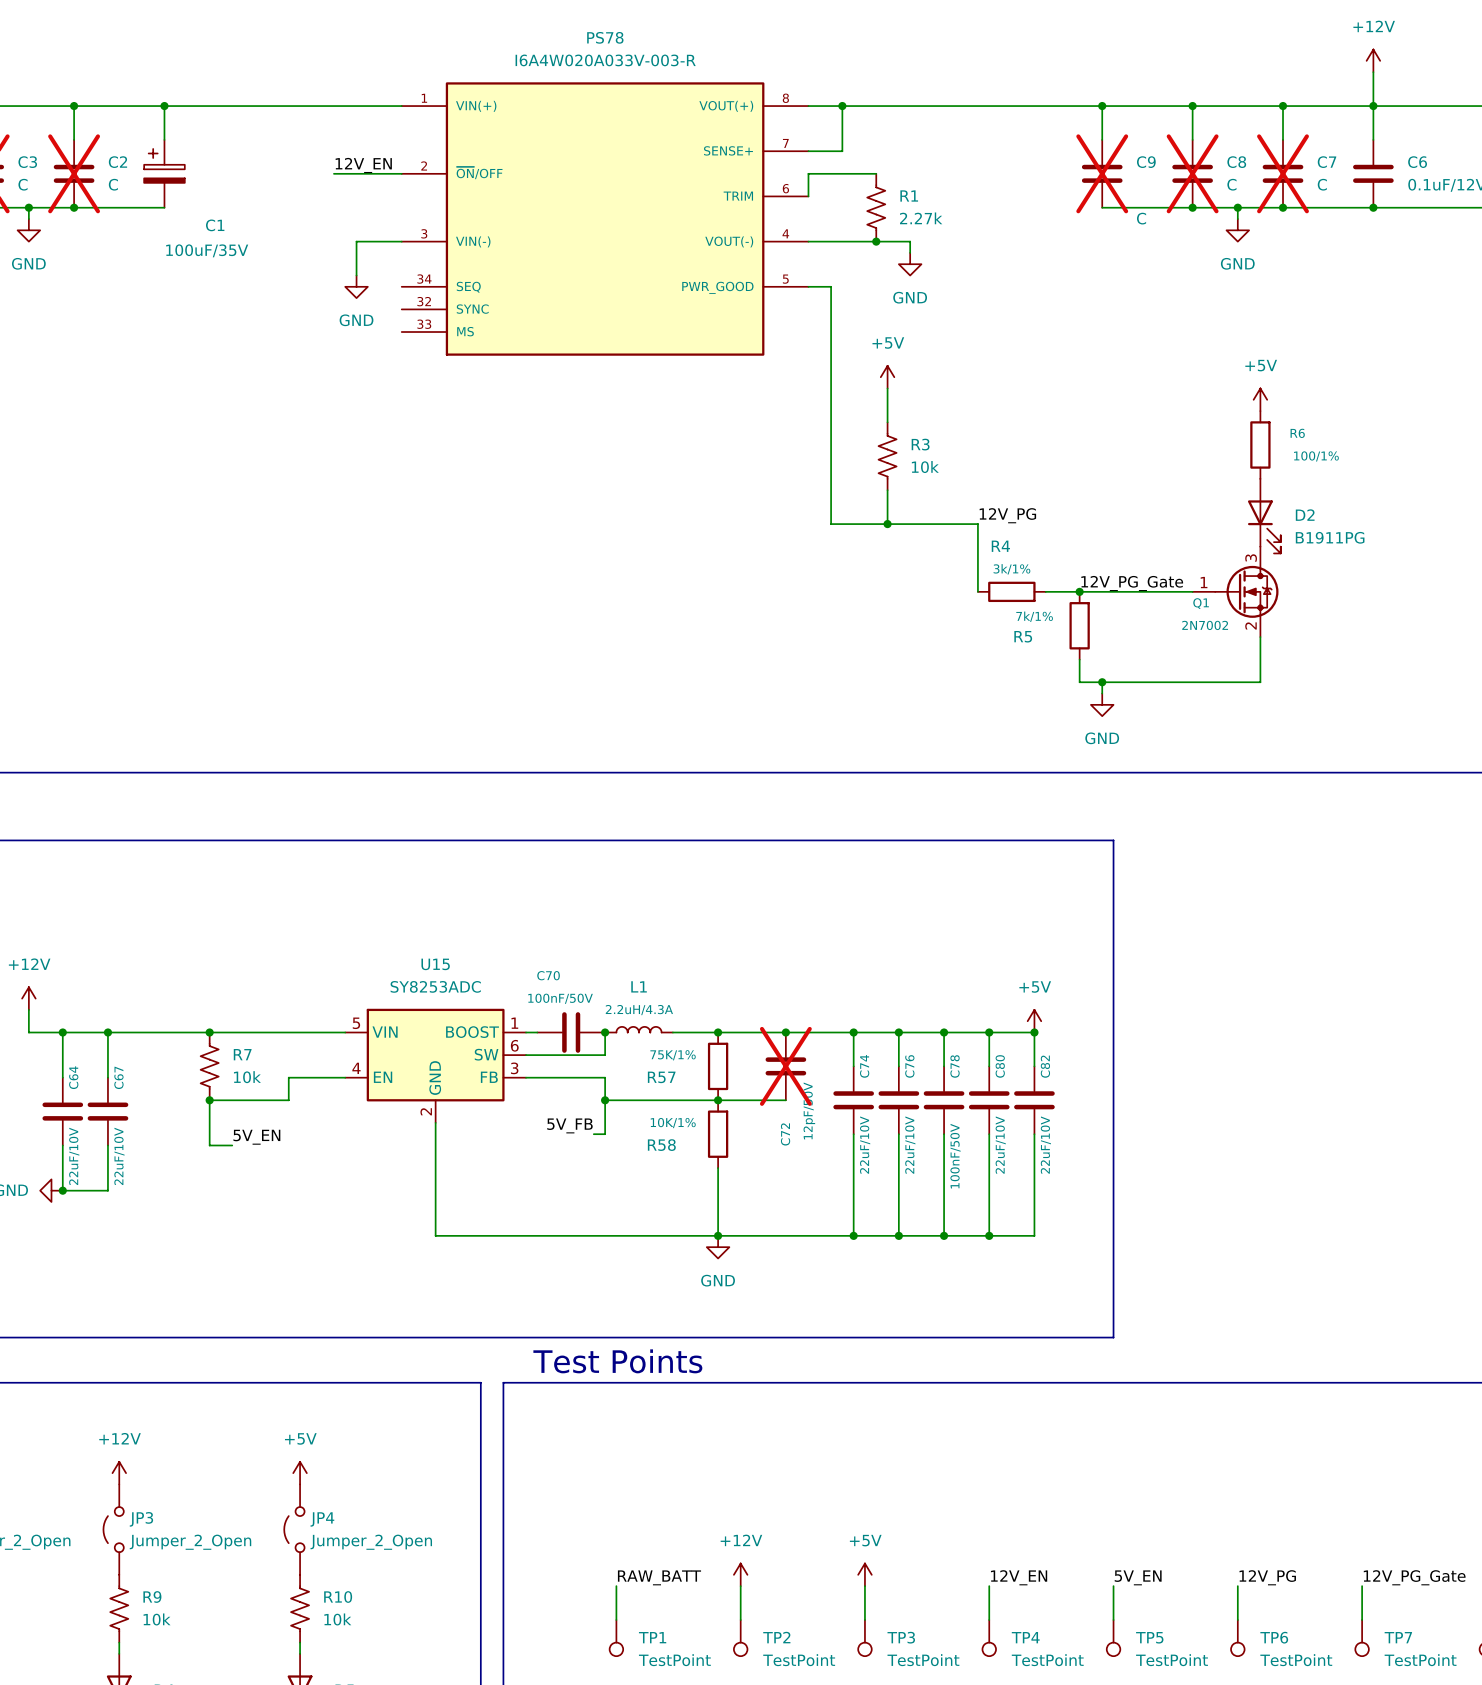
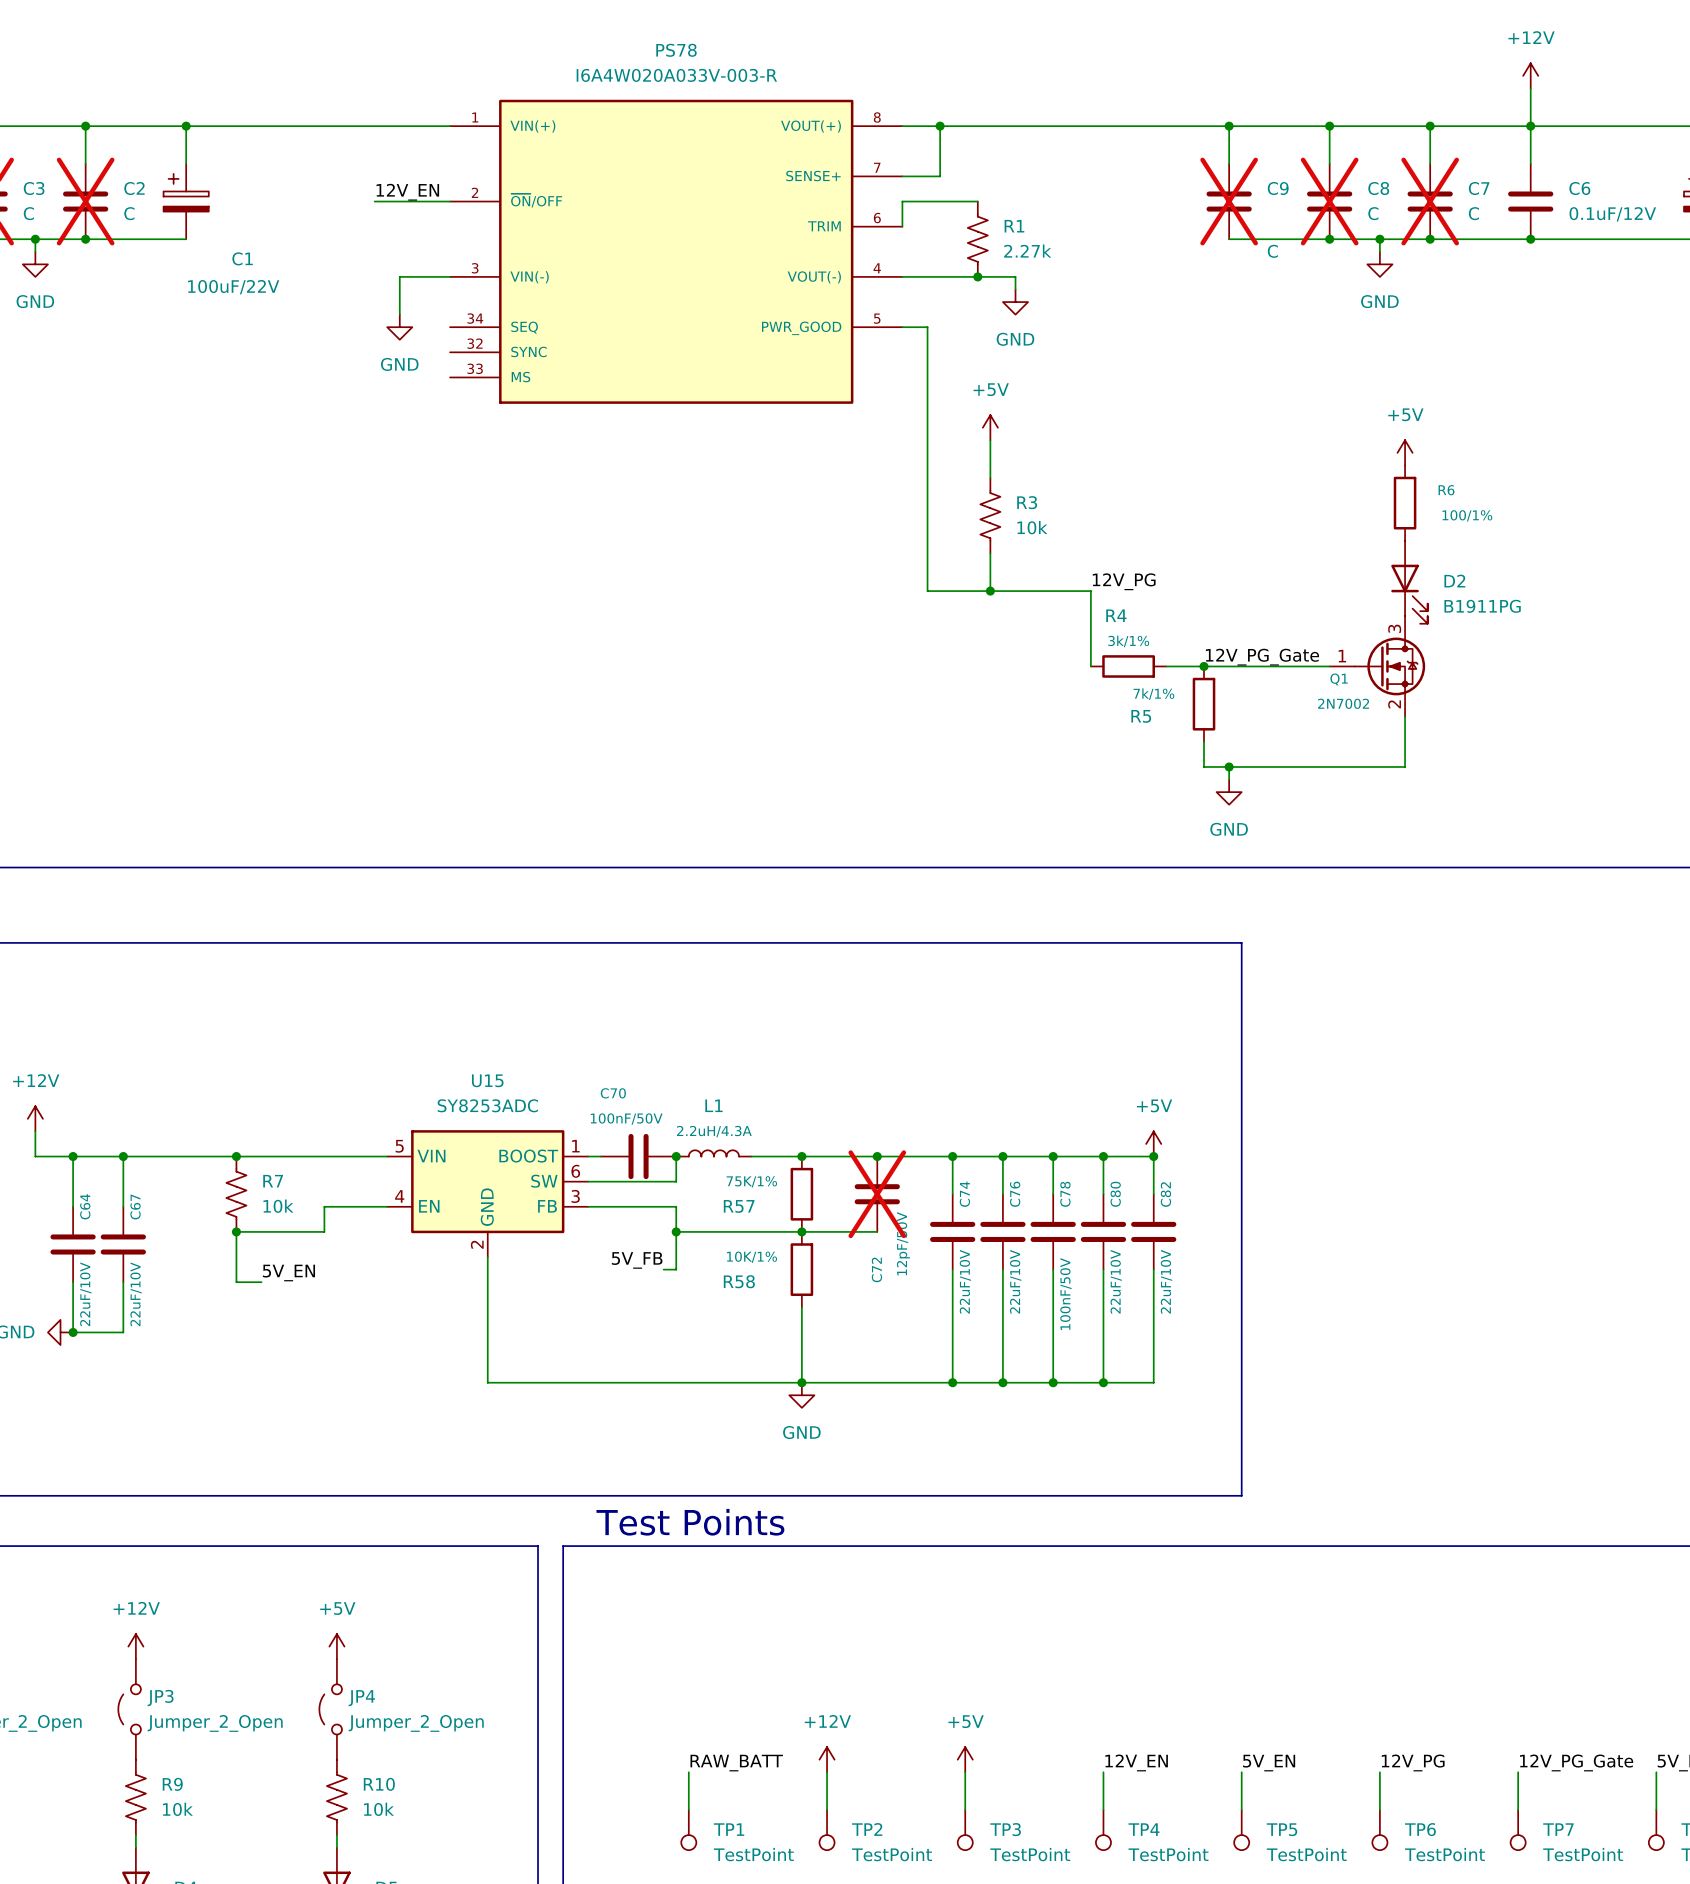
C1 value: 100uF/35V (207, 250) -> 100uF/22V (233, 287)

